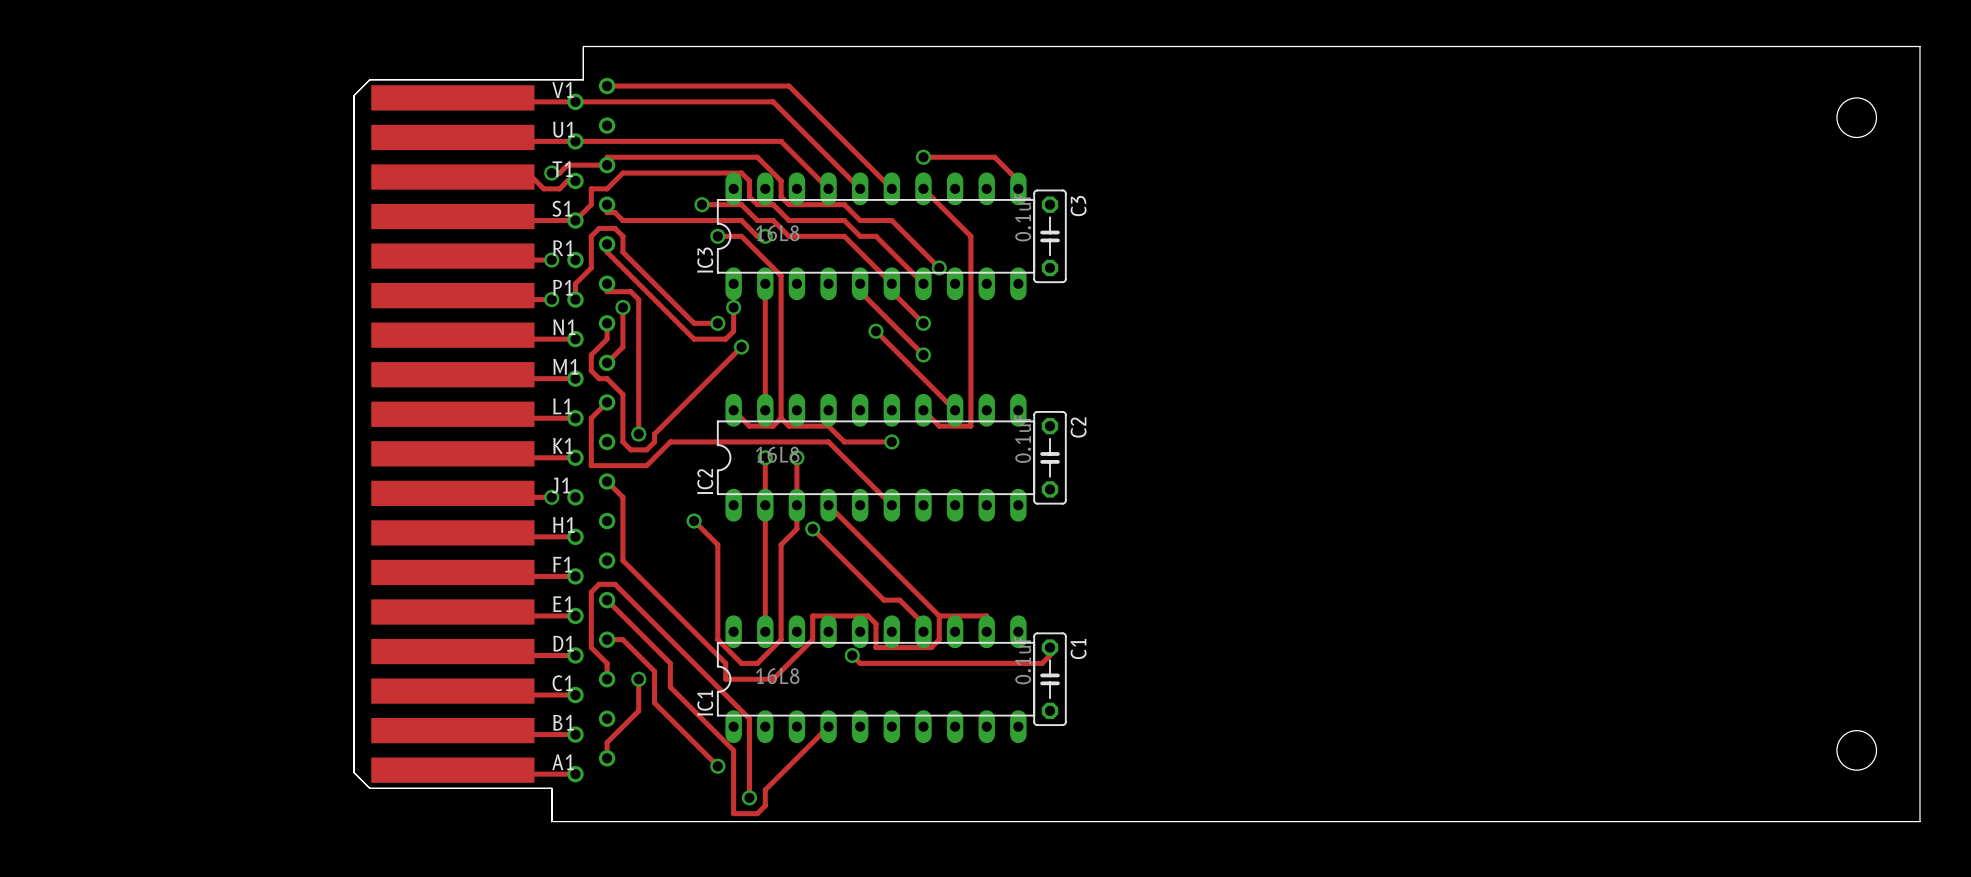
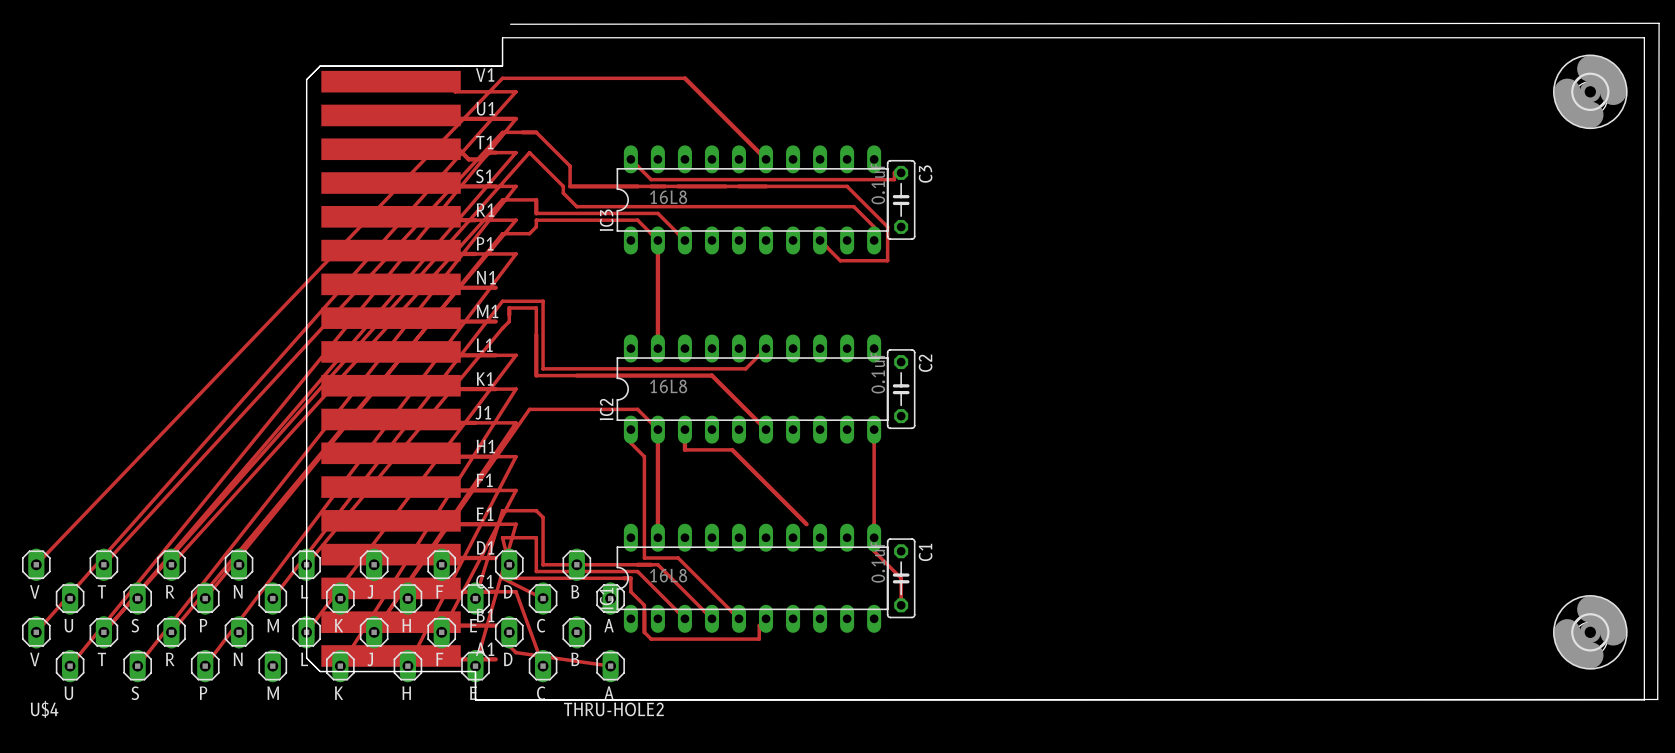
board edge: none -> (510, 24) (1659, 23) (1657, 699) (475, 699)
track: (607, 86) (789, 86) (796, 93) -> (36, 564) (502, 78) (684, 78)
track: (452, 97) (456, 101) (773, 101) (860, 188) -> (391, 81) (455, 85) (455, 91) (516, 91) (36, 632)
part: none -> (1590, 91)
track: (599, 141) (781, 141) (828, 188) -> (516, 118) (70, 666)
track: (607, 157) (607, 165) (567, 165) (559, 173) (551, 173) -> (522, 132) (502, 132) (103, 564)
track: (622, 157) (757, 157) (781, 180) (781, 196) (789, 204) (844, 204) (860, 220) -> none
track: (923, 157) (994, 157) (1018, 180) (1018, 188) -> none
via: (923, 157) -> none
via: (551, 173) -> none
track: none -> (495, 152) (516, 152) (103, 632) (529, 152) (563, 186) (563, 193) (576, 206) (853, 206) (874, 226) (874, 240)
track: none -> (630, 159) (651, 179) (894, 179) (894, 172) (901, 172)
track: (923, 188) (970, 236) (970, 426) (939, 426) (923, 410) -> none
track: (607, 204) (607, 212) (615, 212) (622, 220) (662, 220) -> (536, 132) (570, 166) (570, 186)
track: (702, 204) (741, 204) (757, 220) -> none
via: (702, 204) -> none
track: (575, 220) (591, 204) (591, 188) (607, 188) (622, 173) (741, 173) (749, 180) (749, 196) (757, 204) (773, 204) (789, 220) -> (495, 186) (516, 186) (137, 666)
track: (741, 220) (757, 236) (765, 236) -> (637, 186) (651, 186)
track: (773, 220) (789, 236) (844, 236) (891, 283) (891, 291) (923, 323) -> (664, 186) (678, 186)
track: (844, 220) (860, 236) (876, 236) (923, 283) -> (725, 186) (739, 186)
track: (891, 220) (939, 267) -> (766, 186) (847, 186) (887, 226) (887, 260) (840, 260) (820, 240)
track: (622, 236) (615, 228) (599, 228) (591, 236) (591, 267) (575, 283) (575, 299) -> (536, 199) (502, 199) (171, 564)
track: (717, 236) (741, 236) (781, 275) (781, 418) -> none
via: (717, 236) -> none
via: (765, 236) -> none
track: (607, 244) (607, 252) (694, 339) (725, 339) (733, 331) (733, 307) -> none
track: (622, 252) (694, 323) (717, 323) -> (536, 213) (657, 213) (684, 240)
track: none -> (475, 220) (516, 220) (171, 632)
via: (551, 260) -> none
via: (939, 267) -> none
track: (607, 283) (607, 291) (630, 291) (638, 299) (638, 434) -> none
track: none -> (657, 240) (637, 220) (536, 220) (536, 226) (529, 233) (502, 233) (205, 598)
track: (860, 283) (860, 291) (923, 354) -> none
track: none -> (475, 253) (516, 253) (205, 666)
via: (551, 299) -> none
track: (622, 307) (622, 347) (607, 362) -> none
via: (622, 307) -> none
via: (733, 307) -> none
track: (607, 323) (607, 339) (591, 354) (591, 362) -> none
via: (717, 323) -> none
via: (923, 323) -> none
track: (876, 331) (947, 402) (955, 402) (955, 410) -> none
via: (876, 331) -> none
track: (741, 347) (654, 434) (654, 441) (646, 449) (630, 449) (622, 441) -> none
via: (741, 347) -> none
via: (923, 354) -> none
track: (591, 370) (599, 378) (607, 378) (622, 394) -> (509, 308) (536, 308) (536, 335)
track: none -> (509, 314) (509, 321) (306, 564)
track: (607, 402) (591, 418) (591, 465) (646, 465) (670, 441) -> (536, 375) (576, 375)
track: (733, 410) (749, 426) (773, 426) (781, 418) -> none
track: none -> (766, 348) (745, 368) (543, 368) (543, 301) (502, 301) (272, 598)
track: none -> (495, 355) (516, 355) (306, 632)
track: (781, 418) (789, 426) (828, 426) (844, 441) (891, 441) -> none
part: (591, 430) -> none
via: (638, 434) -> none
via: (891, 441) -> none
track: none -> (495, 389) (516, 389) (340, 666)
track: (765, 457) (765, 505) -> (475, 422) (516, 422) (374, 632) (529, 409) (637, 409) (657, 429)
via: (765, 457) -> none
track: (796, 457) (796, 505) -> none
via: (796, 457) -> none
track: (607, 481) (622, 497) (622, 560) (725, 663) (725, 679) -> (543, 598) (502, 578) (624, 578)
via: (551, 497) -> none
track: none -> (630, 429) (630, 443) (644, 456) (644, 558) (678, 558) (739, 618)
track: (828, 505) (852, 528) -> (684, 449) (732, 449)
track: none -> (874, 429) (874, 551) (901, 578) (901, 605)
track: (694, 521) (717, 544) (717, 639) (741, 663) -> (475, 598) (502, 510) (536, 510) (543, 517) (543, 564) (637, 564)
via: (694, 521) -> none
track: (796, 528) (781, 544) (781, 639) (757, 663) -> none
track: (812, 528) (883, 600) (899, 600) (923, 623) (923, 631) -> none
via: (812, 528) -> none
track: none -> (495, 456) (516, 456) (407, 666)
track: none -> (495, 490) (516, 490) (441, 632)
track: (607, 600) (670, 663) (670, 687) (733, 750) (733, 813) (757, 813) (765, 805) (765, 789) (828, 726) -> (651, 564) (657, 564) (711, 618)
track: none -> (495, 524) (516, 524) (475, 666)
track: (986, 631) (986, 615) (939, 615) (939, 639) (931, 647) (876, 647) (876, 623) (868, 615) (812, 615) (812, 639) (773, 679) (733, 679) -> none
track: (607, 639) (622, 639) (654, 671) (654, 702) (717, 766) -> none
track: (1050, 647) (1050, 655) (1042, 663) (860, 663) (852, 655) -> none
via: (852, 655) -> none
track: none -> (509, 564) (502, 537) (536, 537) (536, 571) (637, 571) (684, 618)
track: (607, 679) (607, 663) (591, 647) (591, 592) (599, 584) (615, 584) (749, 718) -> (630, 578) (630, 591) (644, 605) (644, 612)
track: (638, 679) (638, 710) (607, 742) (607, 758) -> none
via: (638, 679) -> none
track: none -> (495, 591) (516, 591) (543, 666)
U$4: none -> THRU-HOLE2 (323, 615)
track: none -> (509, 632) (509, 645) (516, 652) (610, 666)
track: (749, 742) (749, 797) -> (644, 632) (651, 639) (759, 639) (759, 625) (766, 618)
part: none -> (1590, 632)
via: (717, 766) -> none
via: (749, 797) -> none

